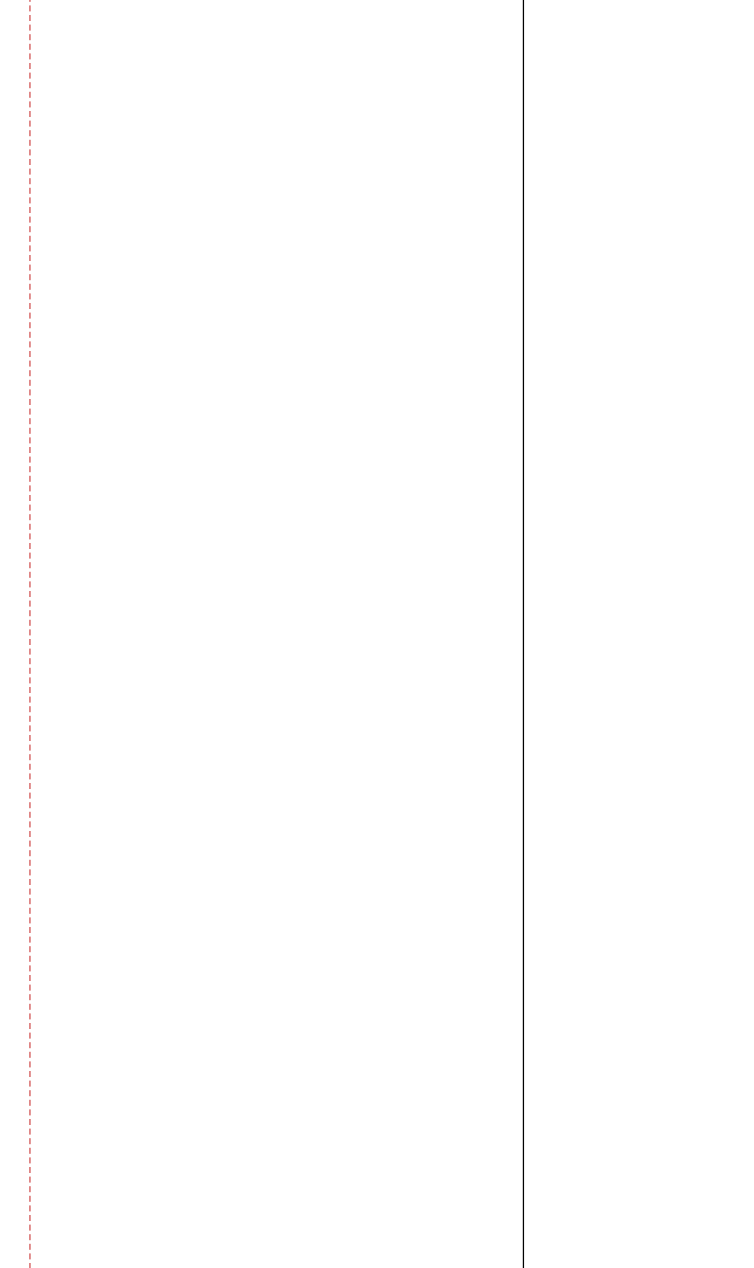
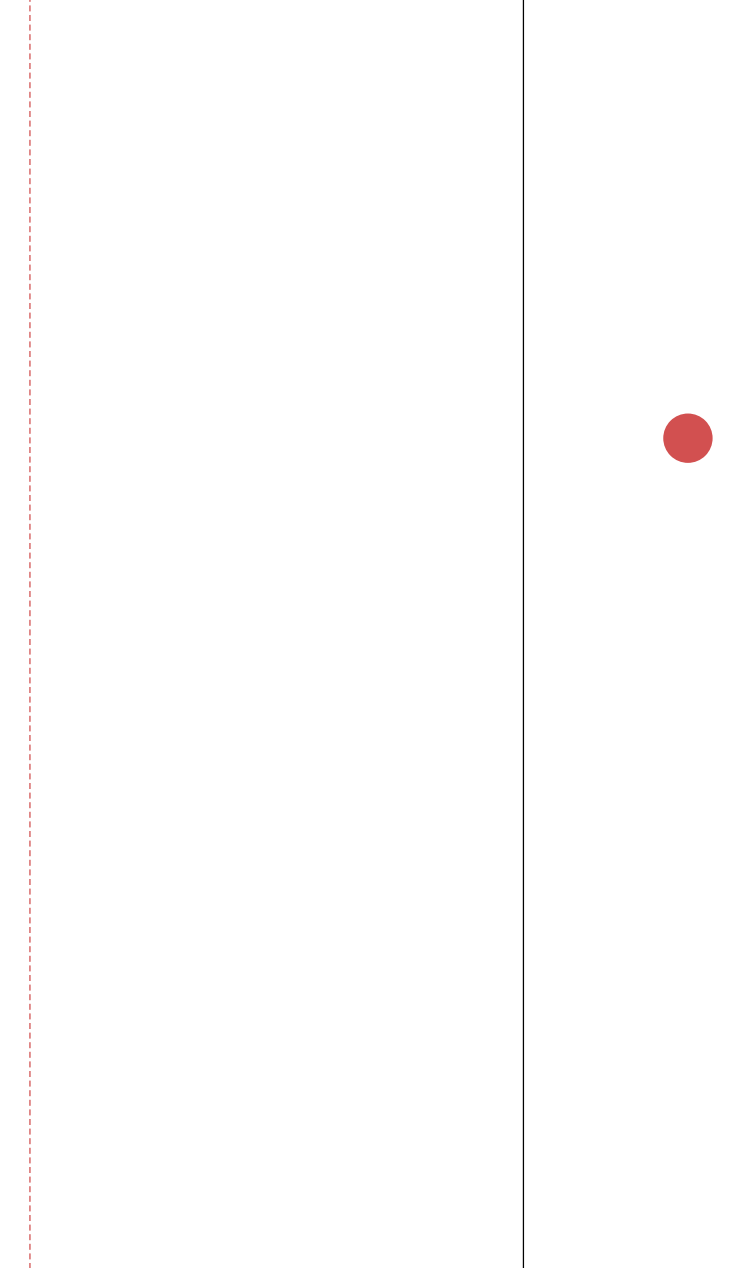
part: none -> (687, 438)

